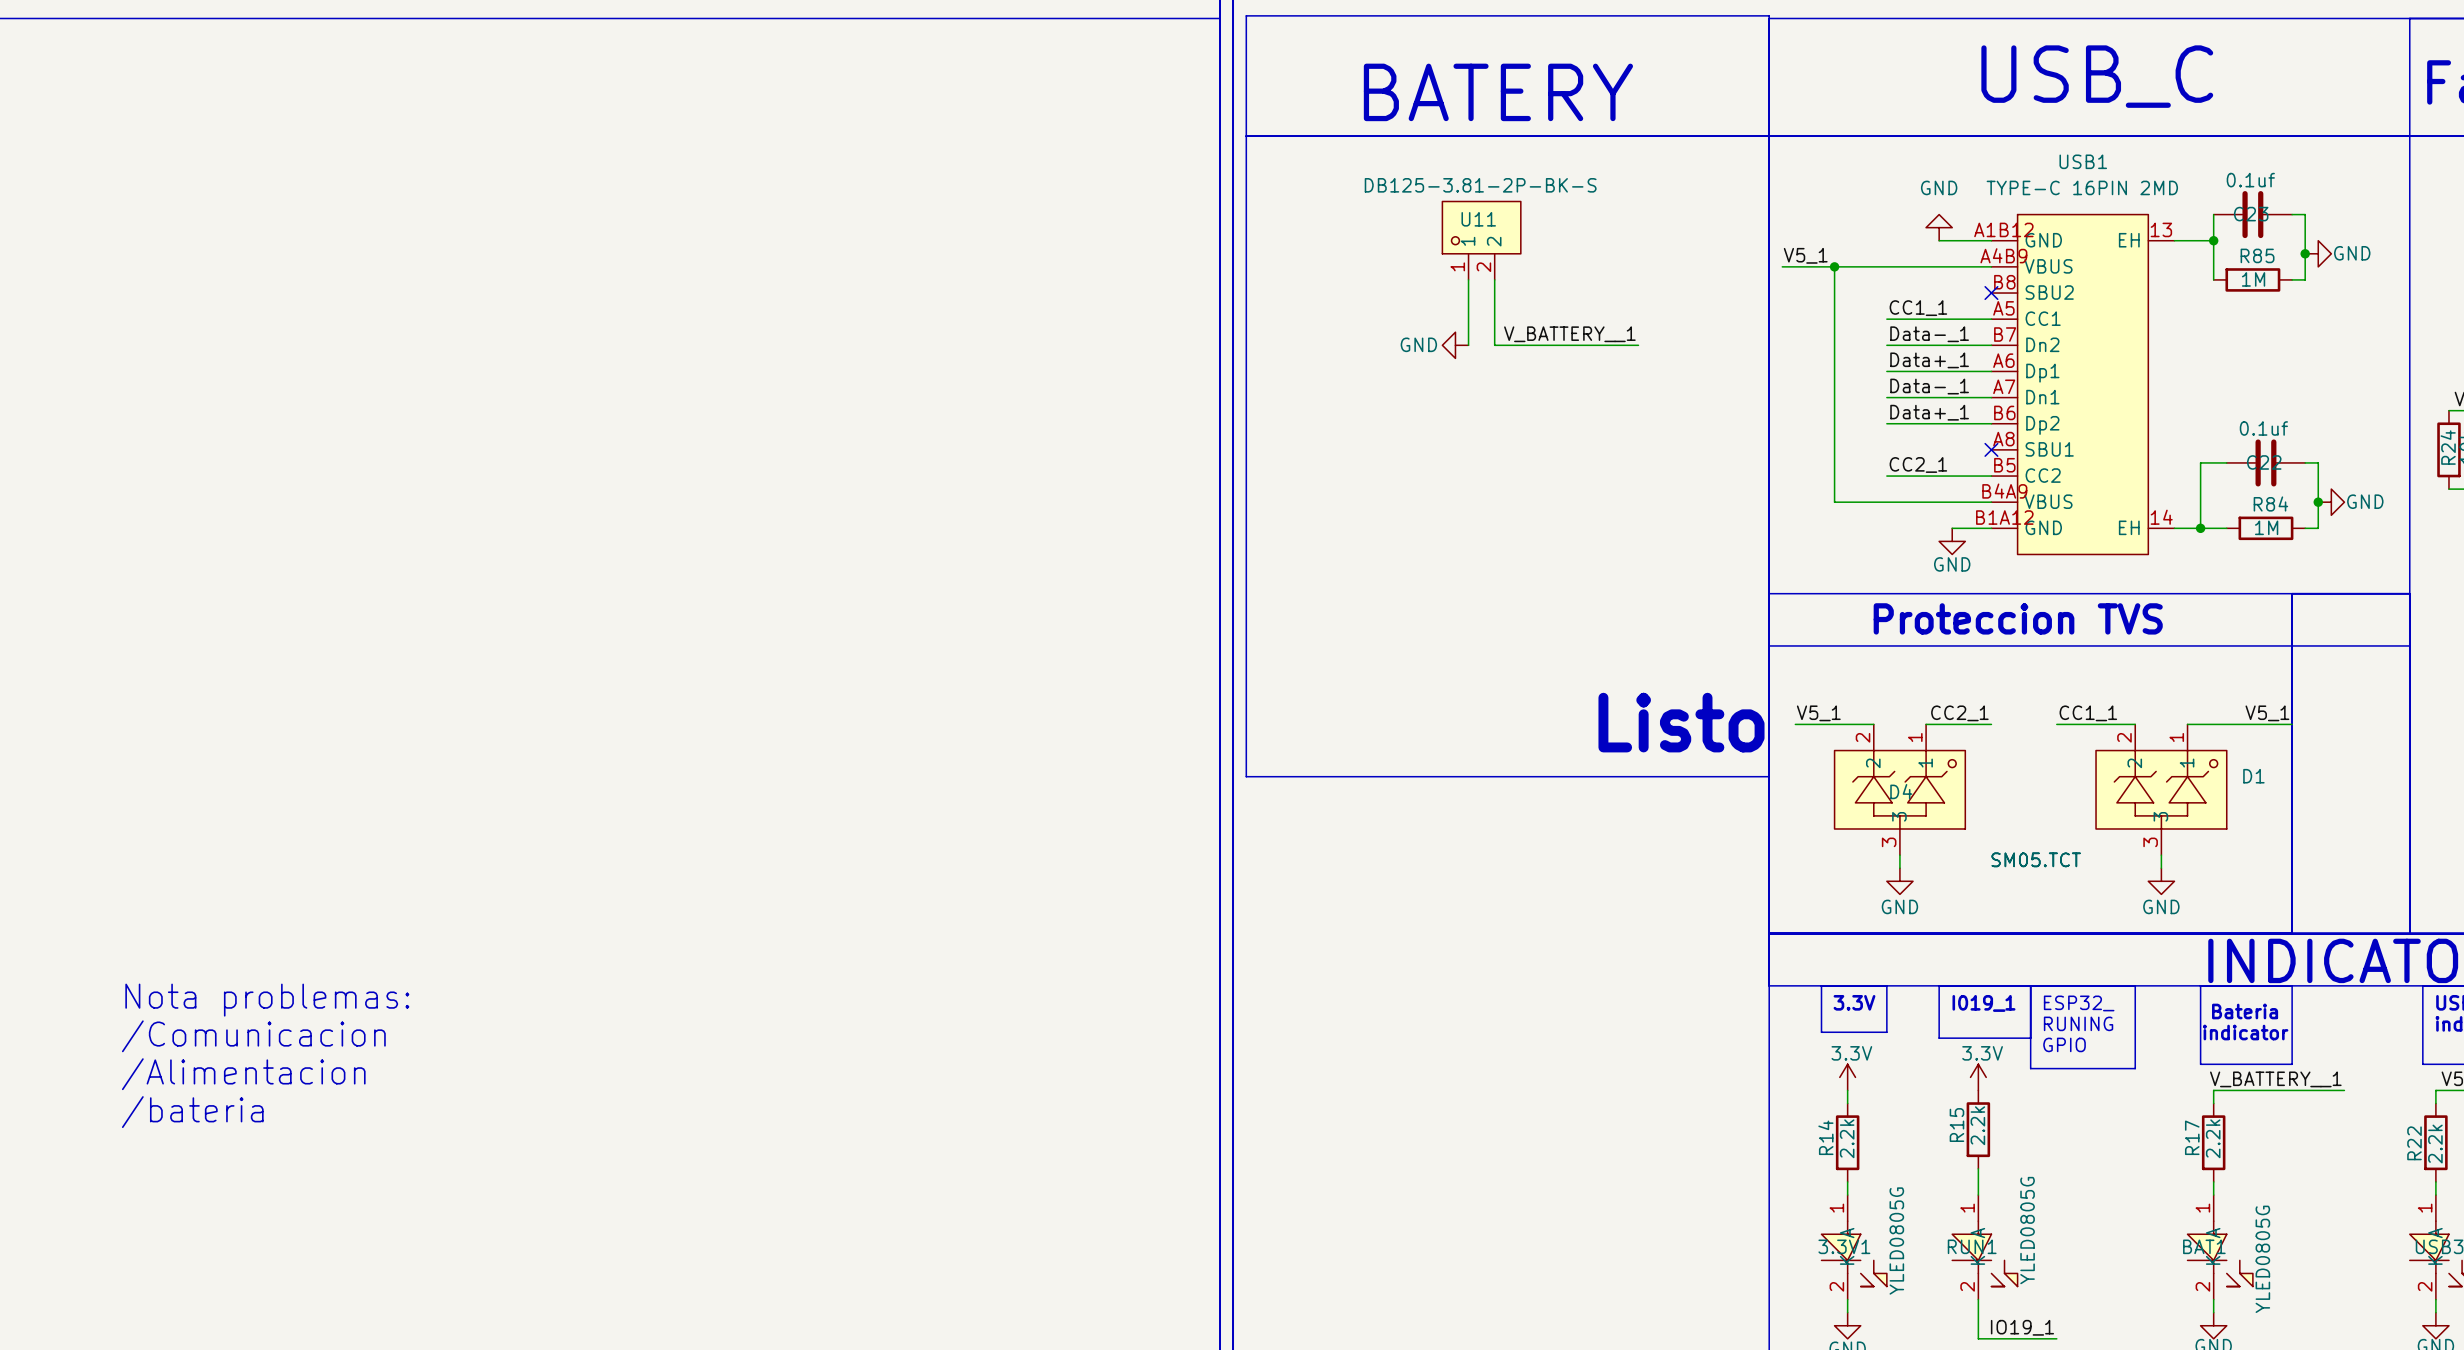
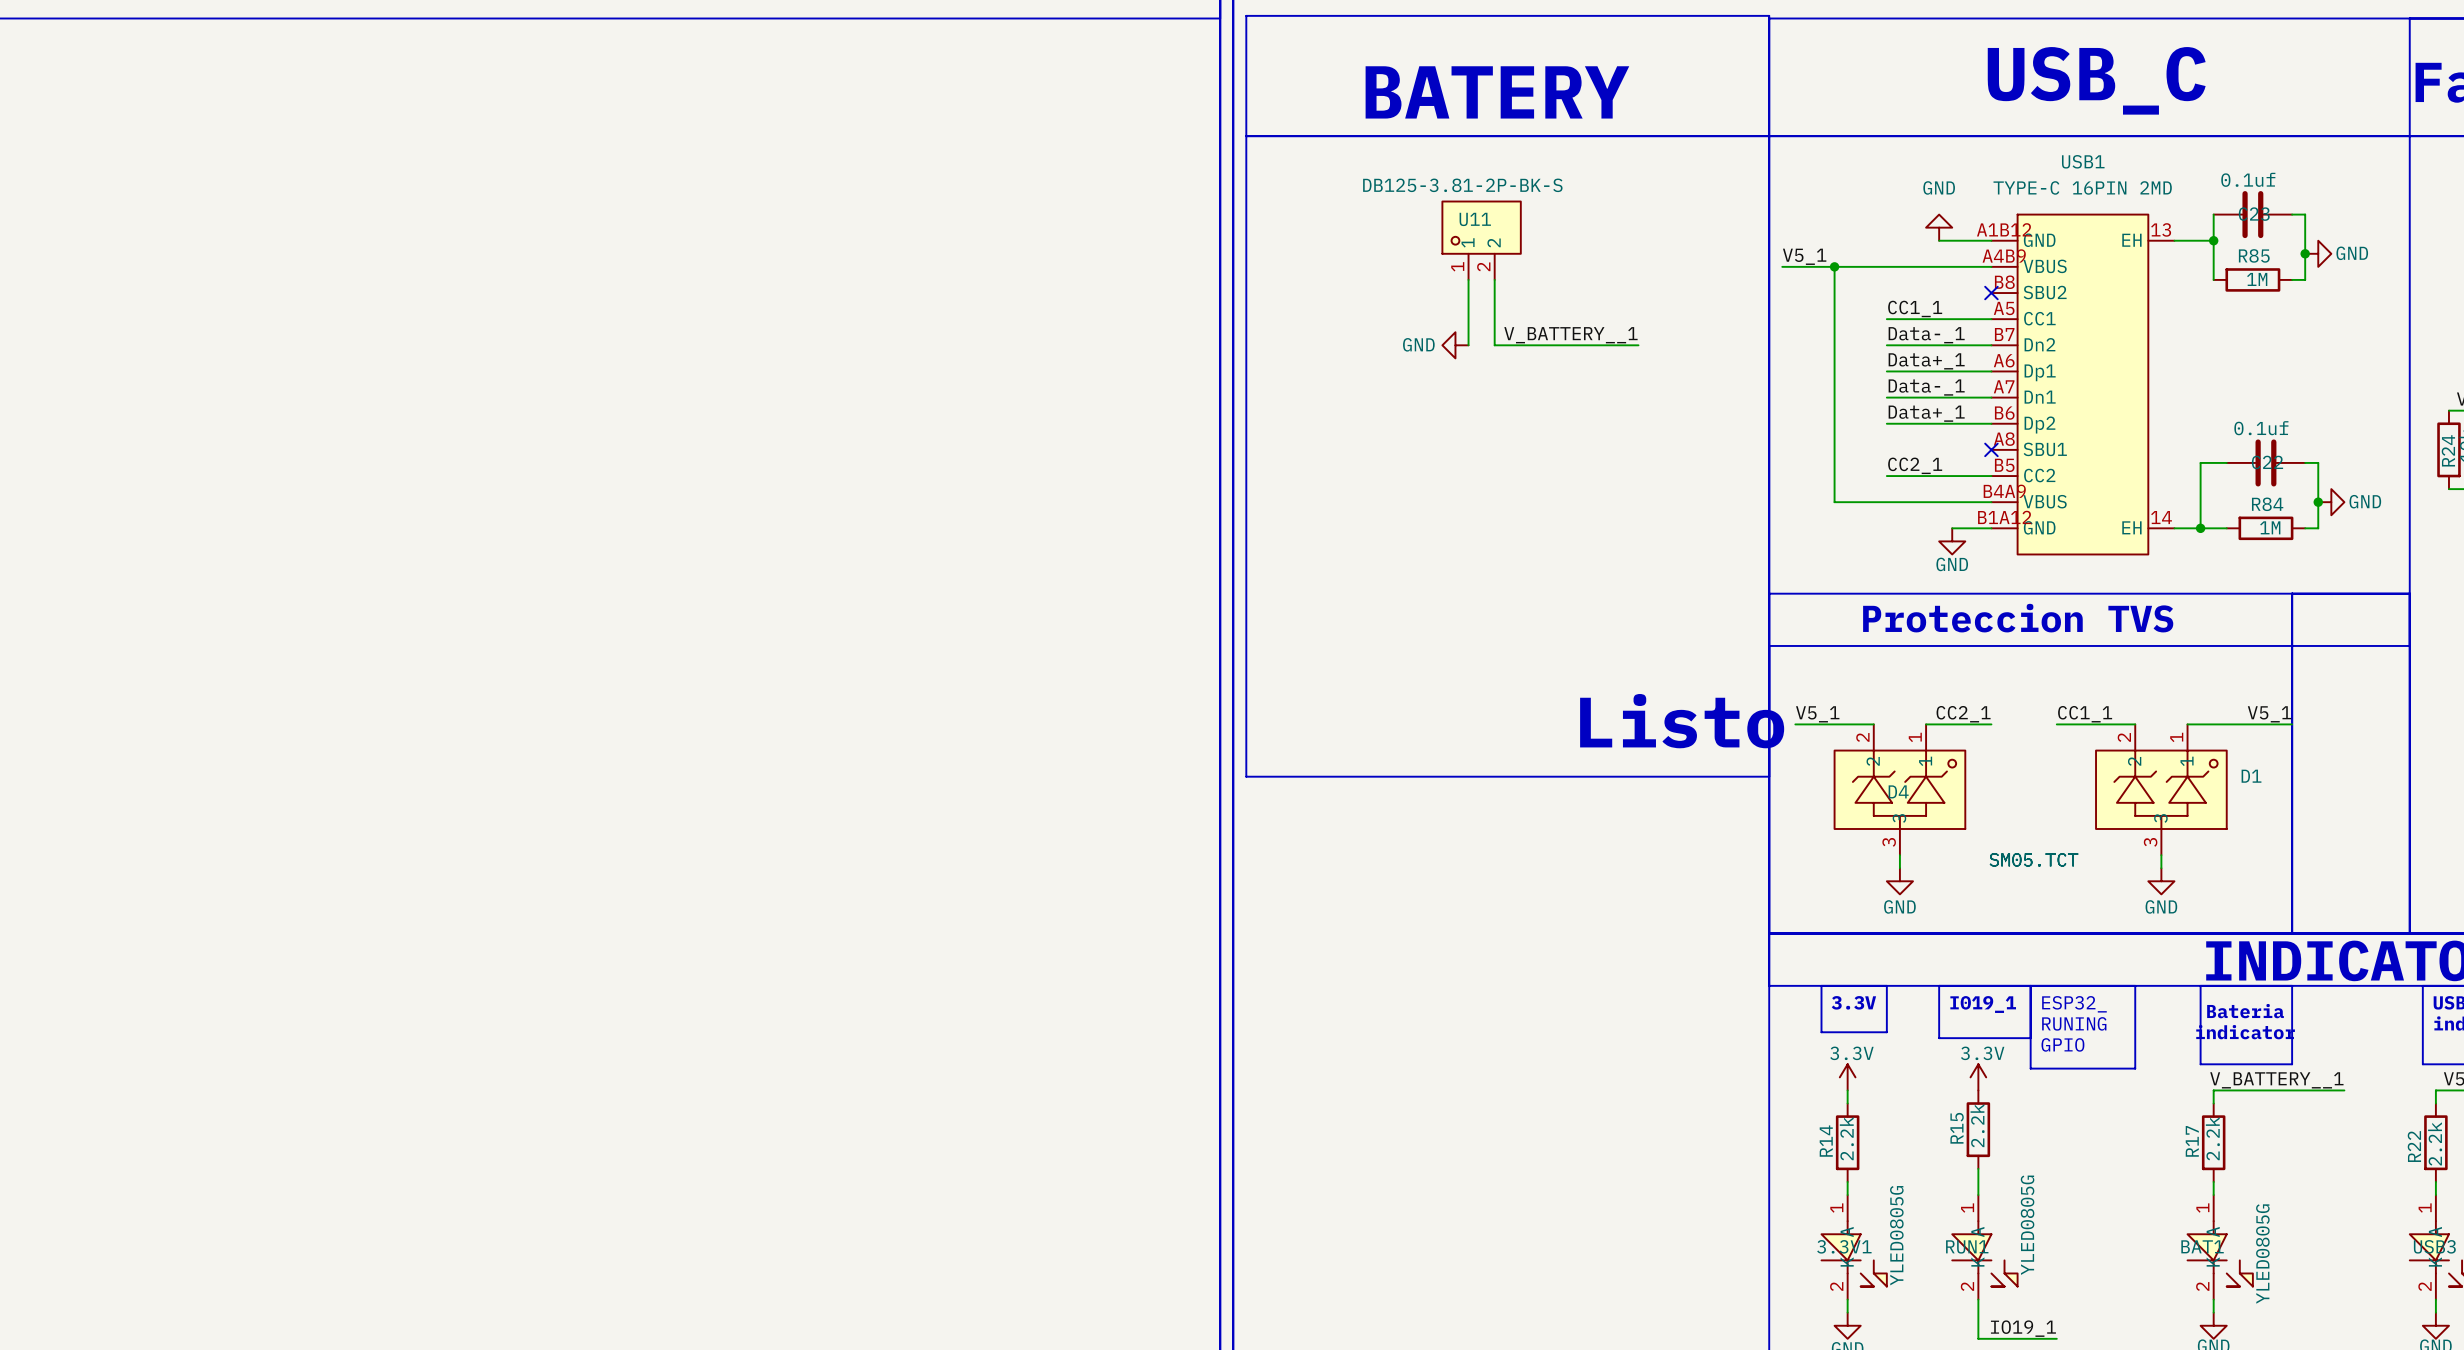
text: Nota problemas: (267, 1000) -> none
text: /Comunicacion (253, 1036) -> none
text: /Alimentacion (243, 1074) -> none
text: /bateria (192, 1112) -> none

